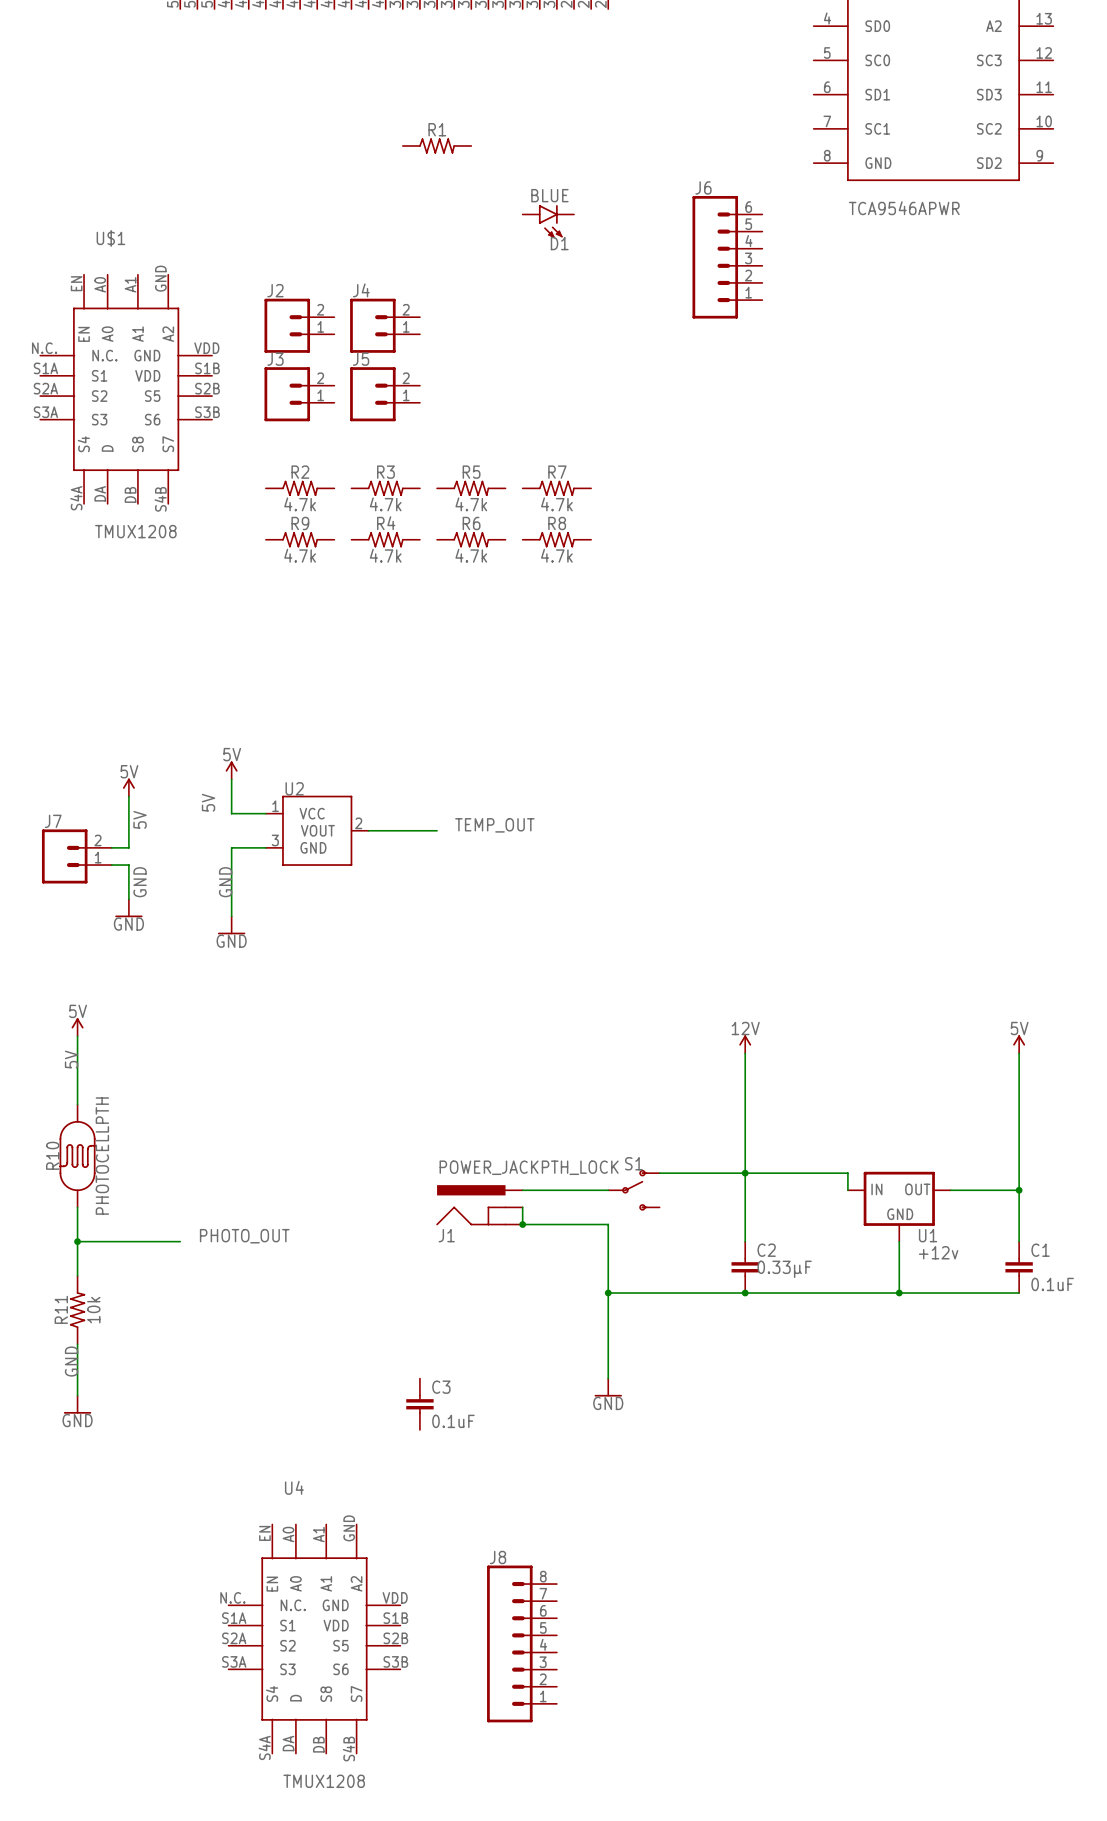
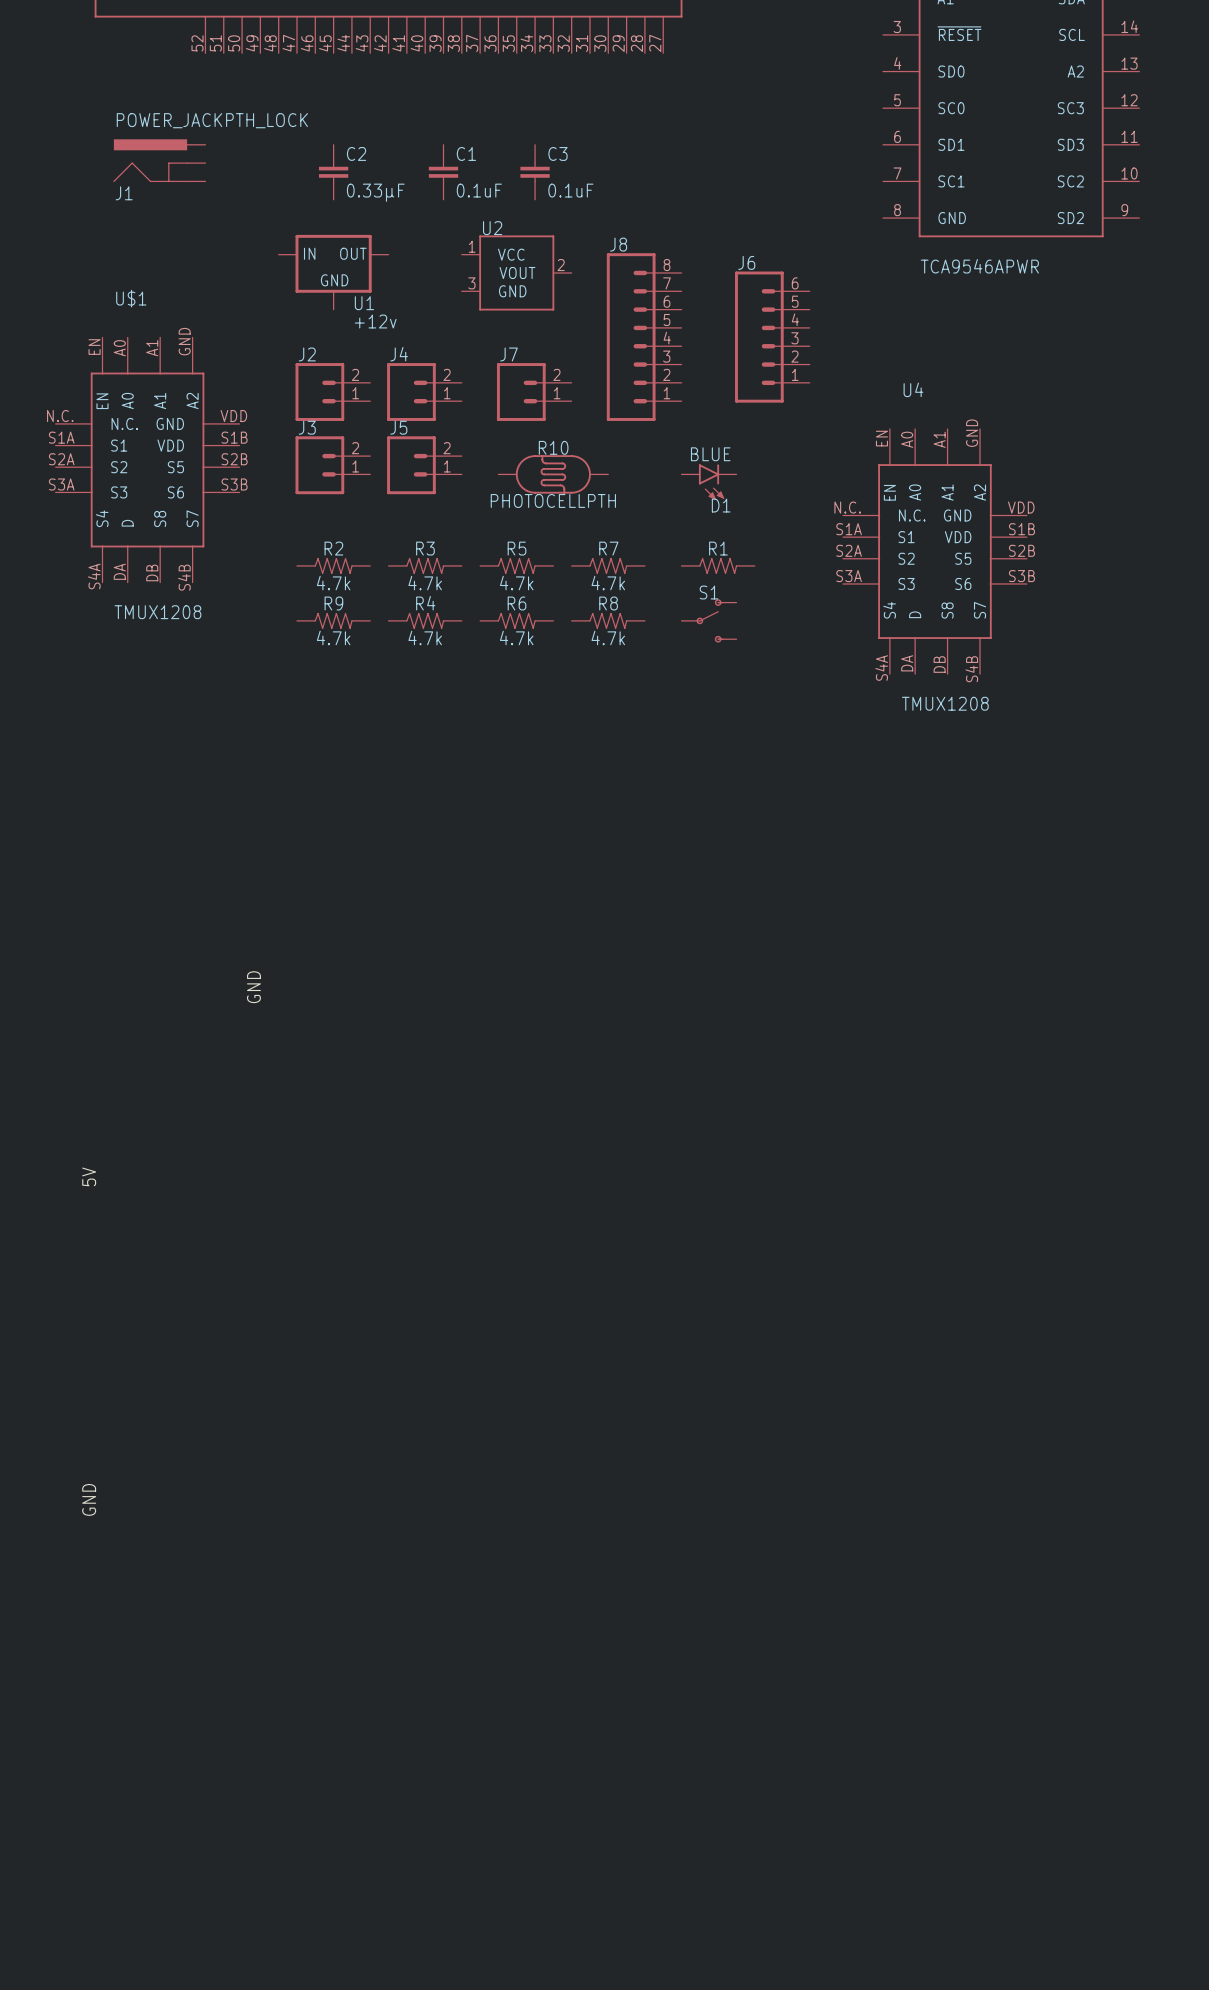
R1 position: (437, 146) -> (718, 565)
D1 position: (548, 221) -> (709, 482)
J6 position: (727, 257) -> (772, 337)
power symbol: 5V (231, 770) -> none
wire: (231, 779) (231, 813) (265, 813) -> none
power symbol: 5V (128, 787) -> none
wire: (128, 796) (128, 847) (111, 847) -> none
label: 5V (208, 802) -> none
label: 5V (140, 819) -> none
label: TEMP_OUT (494, 825) -> none
U2 position: (317, 830) -> (516, 272)
wire: (368, 830) (437, 830) -> none
wire: (265, 847) (231, 847) (231, 916) -> none
J7 position: (76, 856) -> (534, 392)
wire: (111, 865) (128, 865) (128, 899) -> none
label: GND (140, 882) -> none
power symbol: GND (128, 908) -> none
power symbol: GND (231, 925) -> none
power symbol: 5V (77, 1027) -> none
wire: (77, 1036) (77, 1104) -> none
power symbol: 12V (745, 1044) -> none
power symbol: 5V (1019, 1044) -> none
wire: (745, 1053) (745, 1241) -> none
wire: (1019, 1053) (1019, 1241) -> none
R10 rotation: 0° (77, 1156) -> 90° clockwise (553, 474)
R10 position: (77, 1156) -> (553, 474)
wire: (659, 1173) (847, 1173) (847, 1190) -> none
junction: (745, 1173) -> none
wire: (522, 1190) (608, 1190) -> none
S1 position: (633, 1190) -> (709, 620)
wire: (950, 1190) (1019, 1190) -> none
junction: (1019, 1190) -> none
J1 position: (479, 1205) -> (159, 160)
U1 position: (899, 1206) -> (333, 272)
wire: (77, 1207) (77, 1275) -> none
wire: (522, 1207) (522, 1224) (608, 1224) (608, 1378) -> none
junction: (522, 1224) -> none
label: PHOTO_OUT (244, 1236) -> none
wire: (77, 1241) (180, 1241) -> none
junction: (77, 1241) -> none
wire: (899, 1241) (899, 1293) -> none
C2 position: (745, 1267) -> (333, 172)
C1 position: (1019, 1267) -> (443, 172)
C2 value position: 0.33µF (784, 1269) -> 0.33µF (375, 192)
wire: (608, 1293) (1019, 1293) -> none
junction: (608, 1293) -> none
junction: (745, 1293) -> none
junction: (899, 1293) -> none
R11: 10k (77, 1310) -> none
wire: (77, 1344) (77, 1395) -> none
power symbol: GND (608, 1387) -> none
power symbol: GND (77, 1404) -> none
C3 position: (419, 1404) -> (535, 172)
U4 position: (314, 1639) -> (934, 551)
J8 position: (521, 1643) -> (644, 337)

